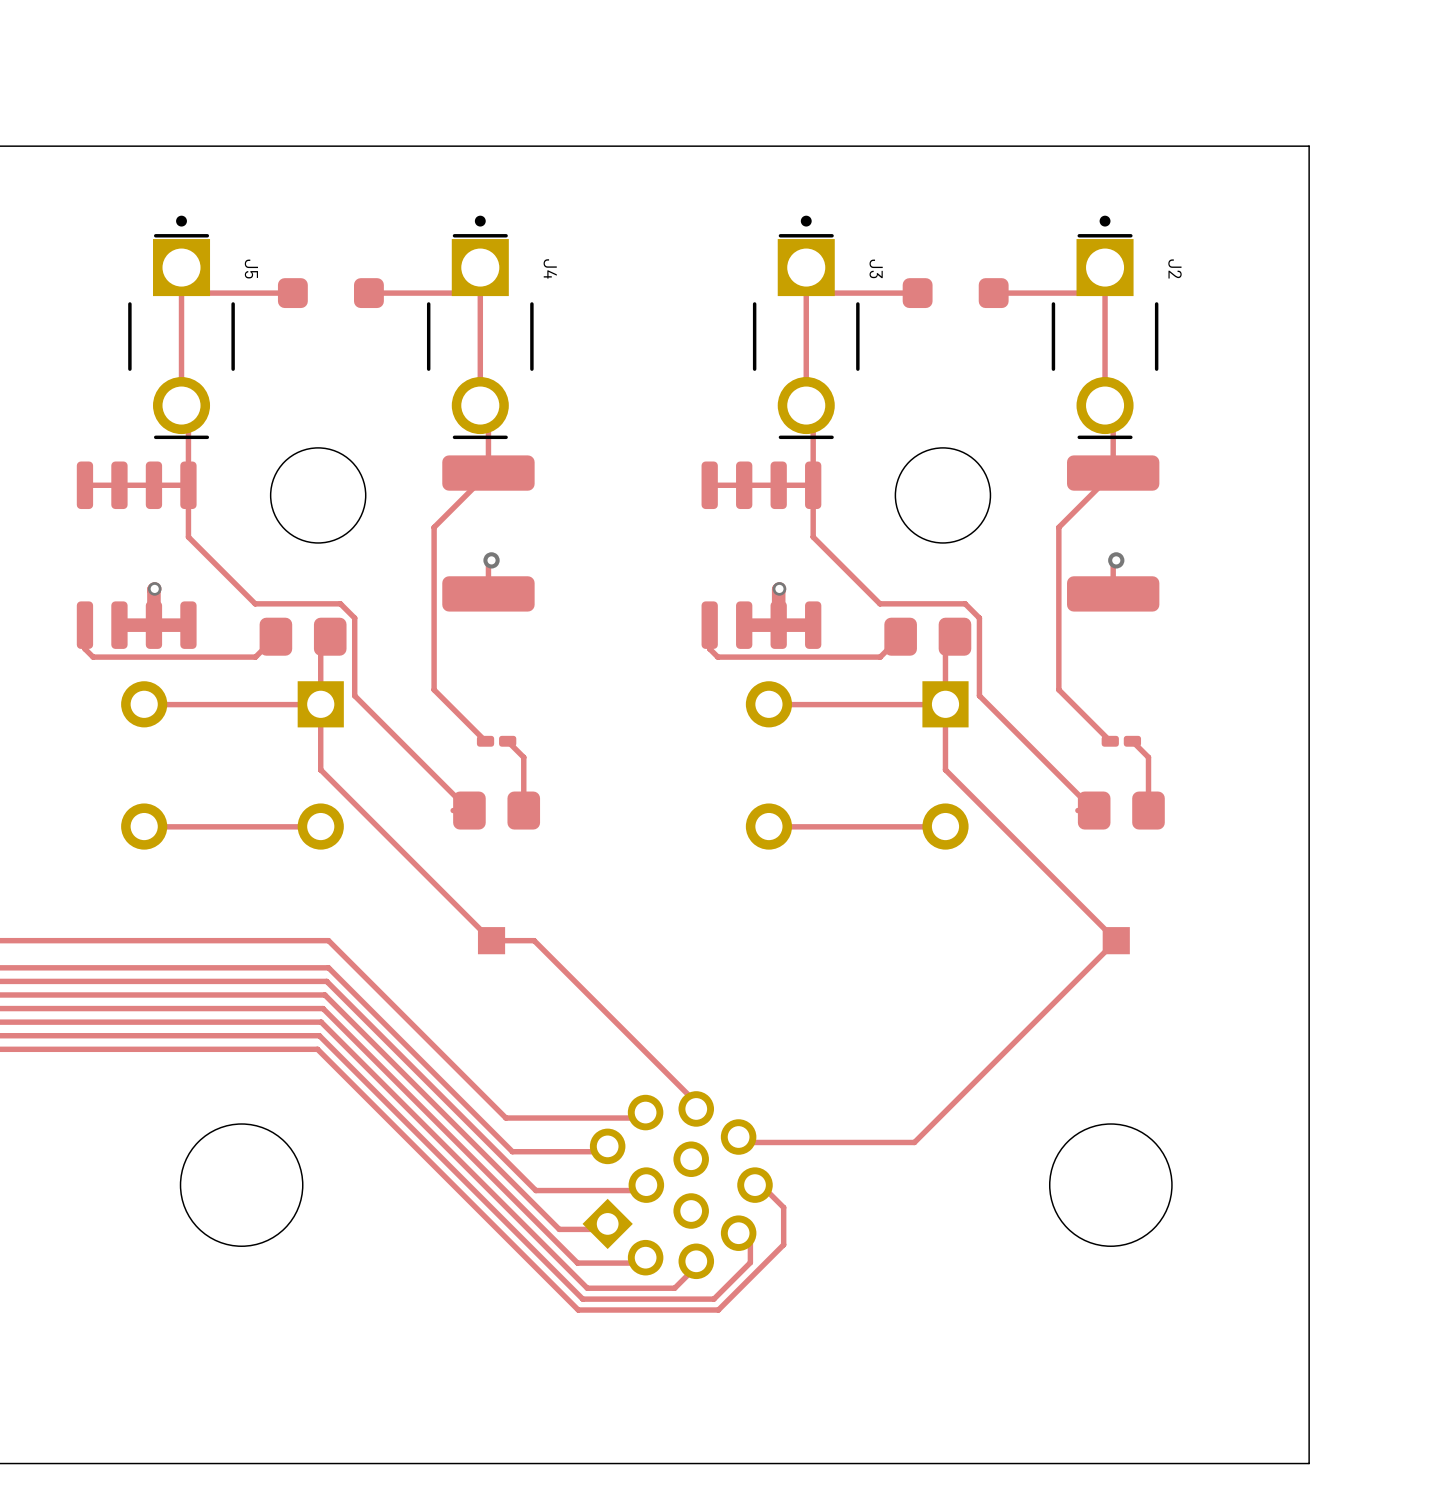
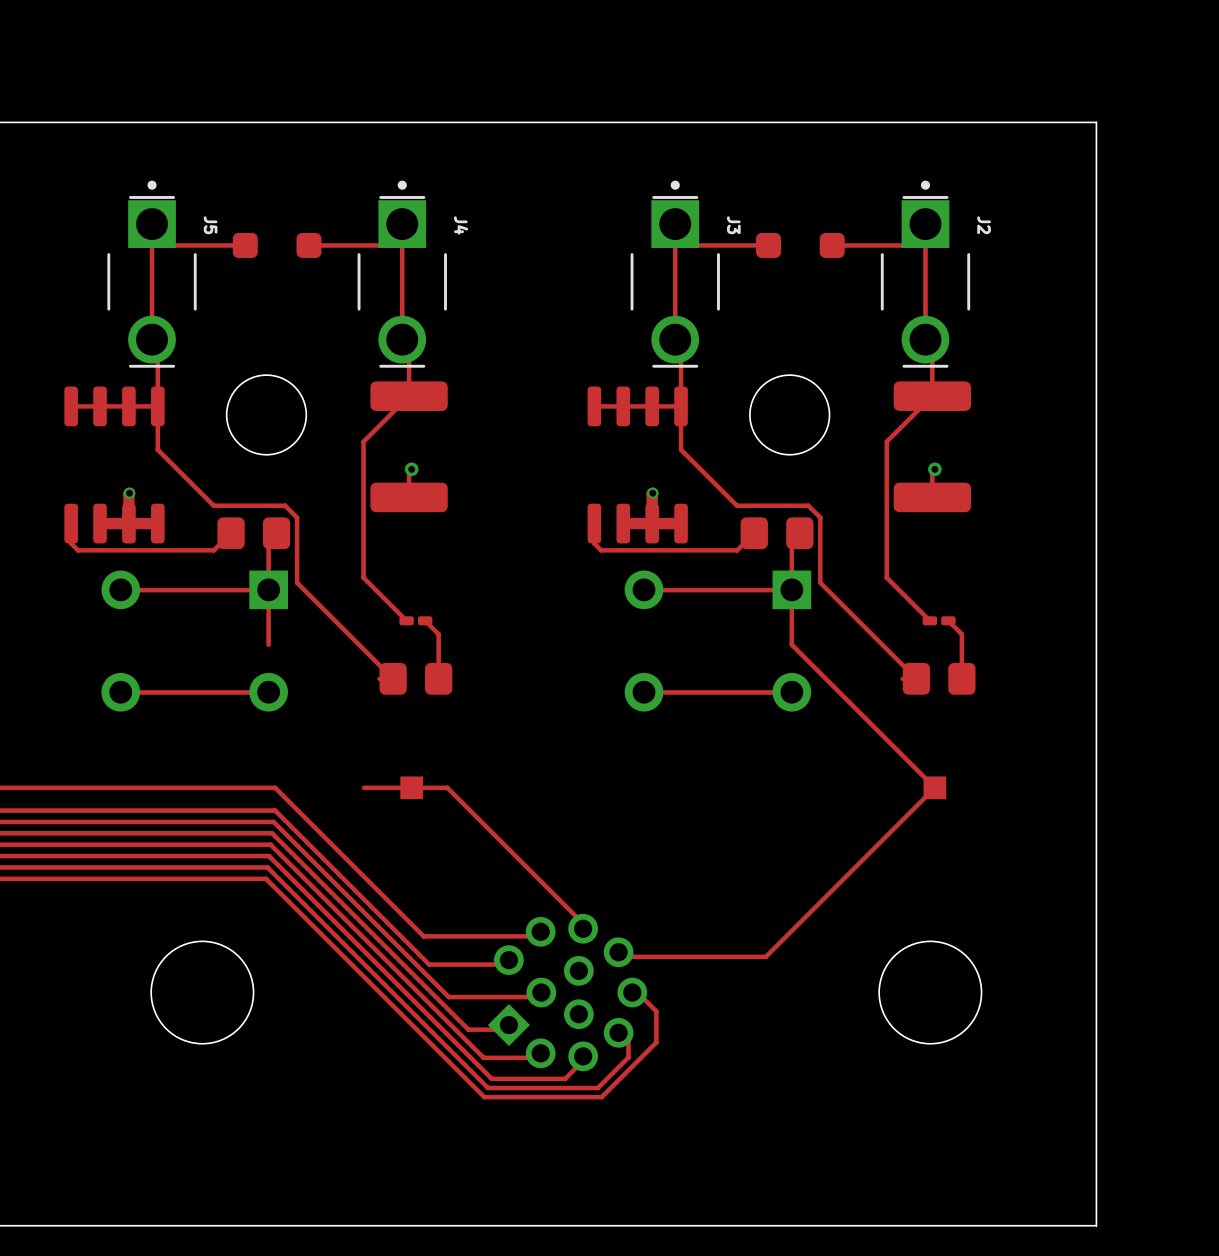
top track: (320, 769) (491, 940) -> (364, 787) (411, 787)

